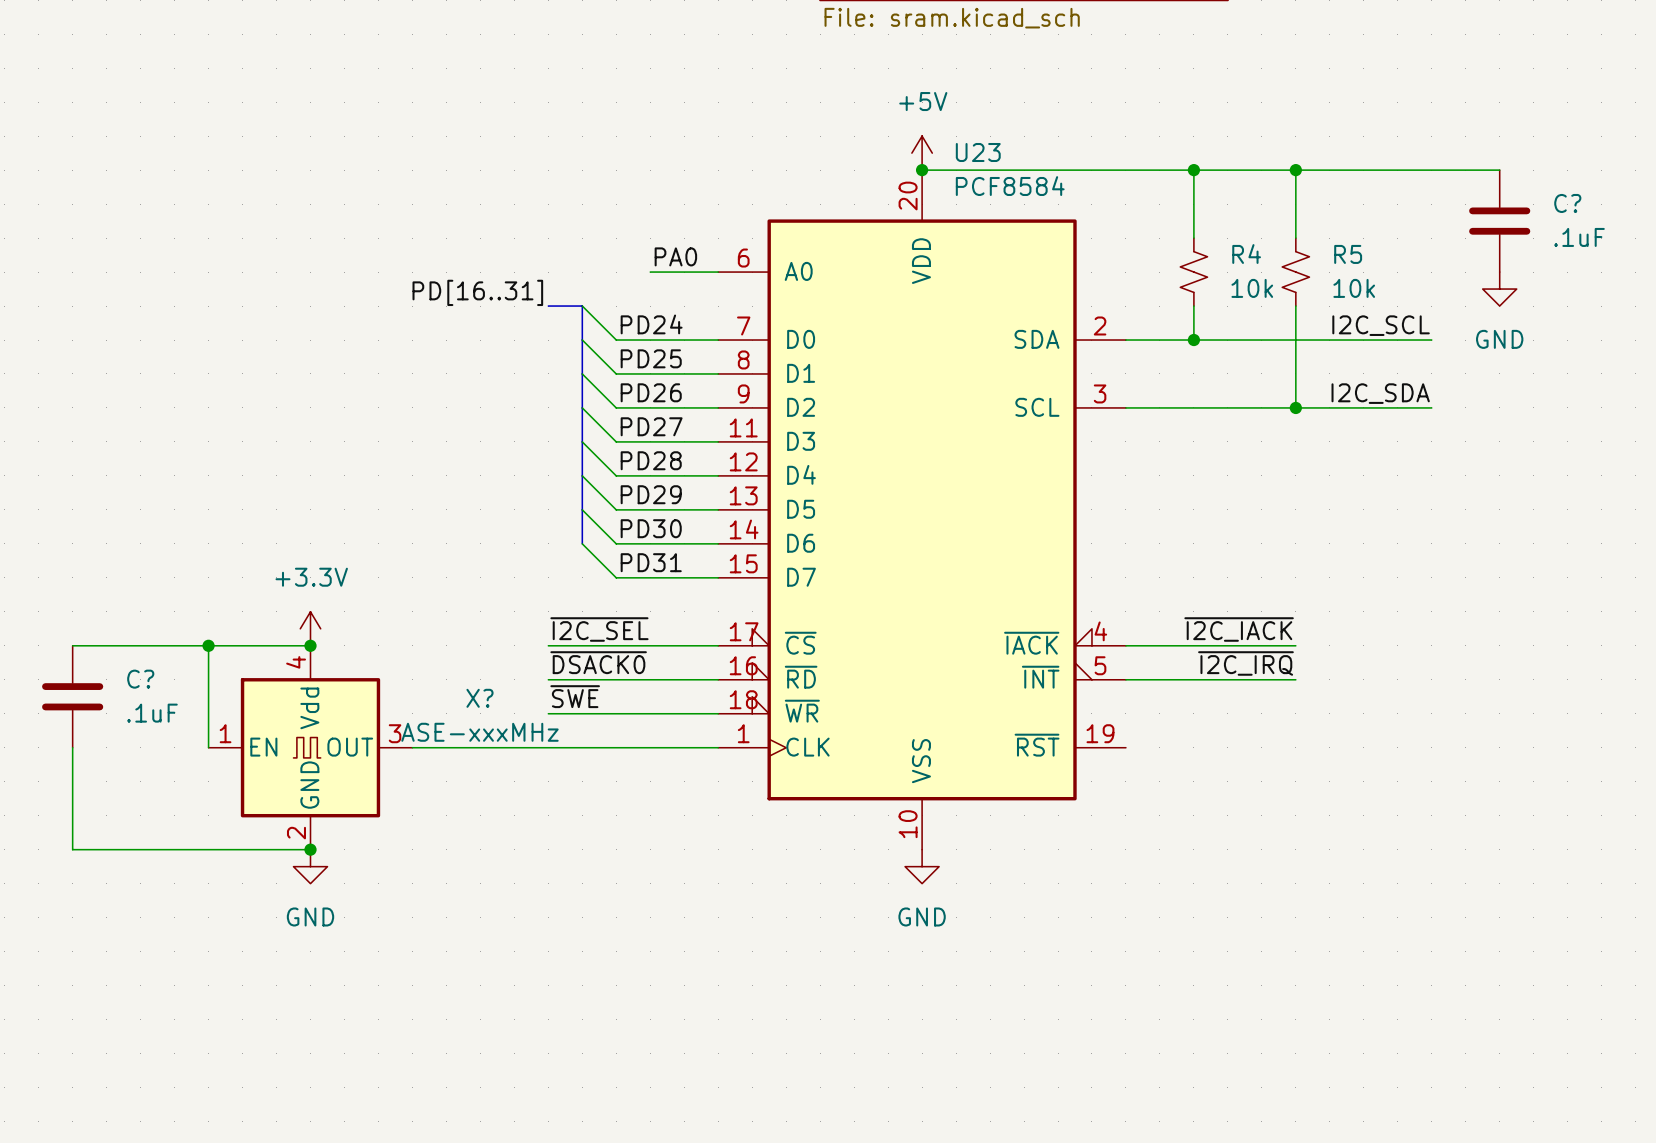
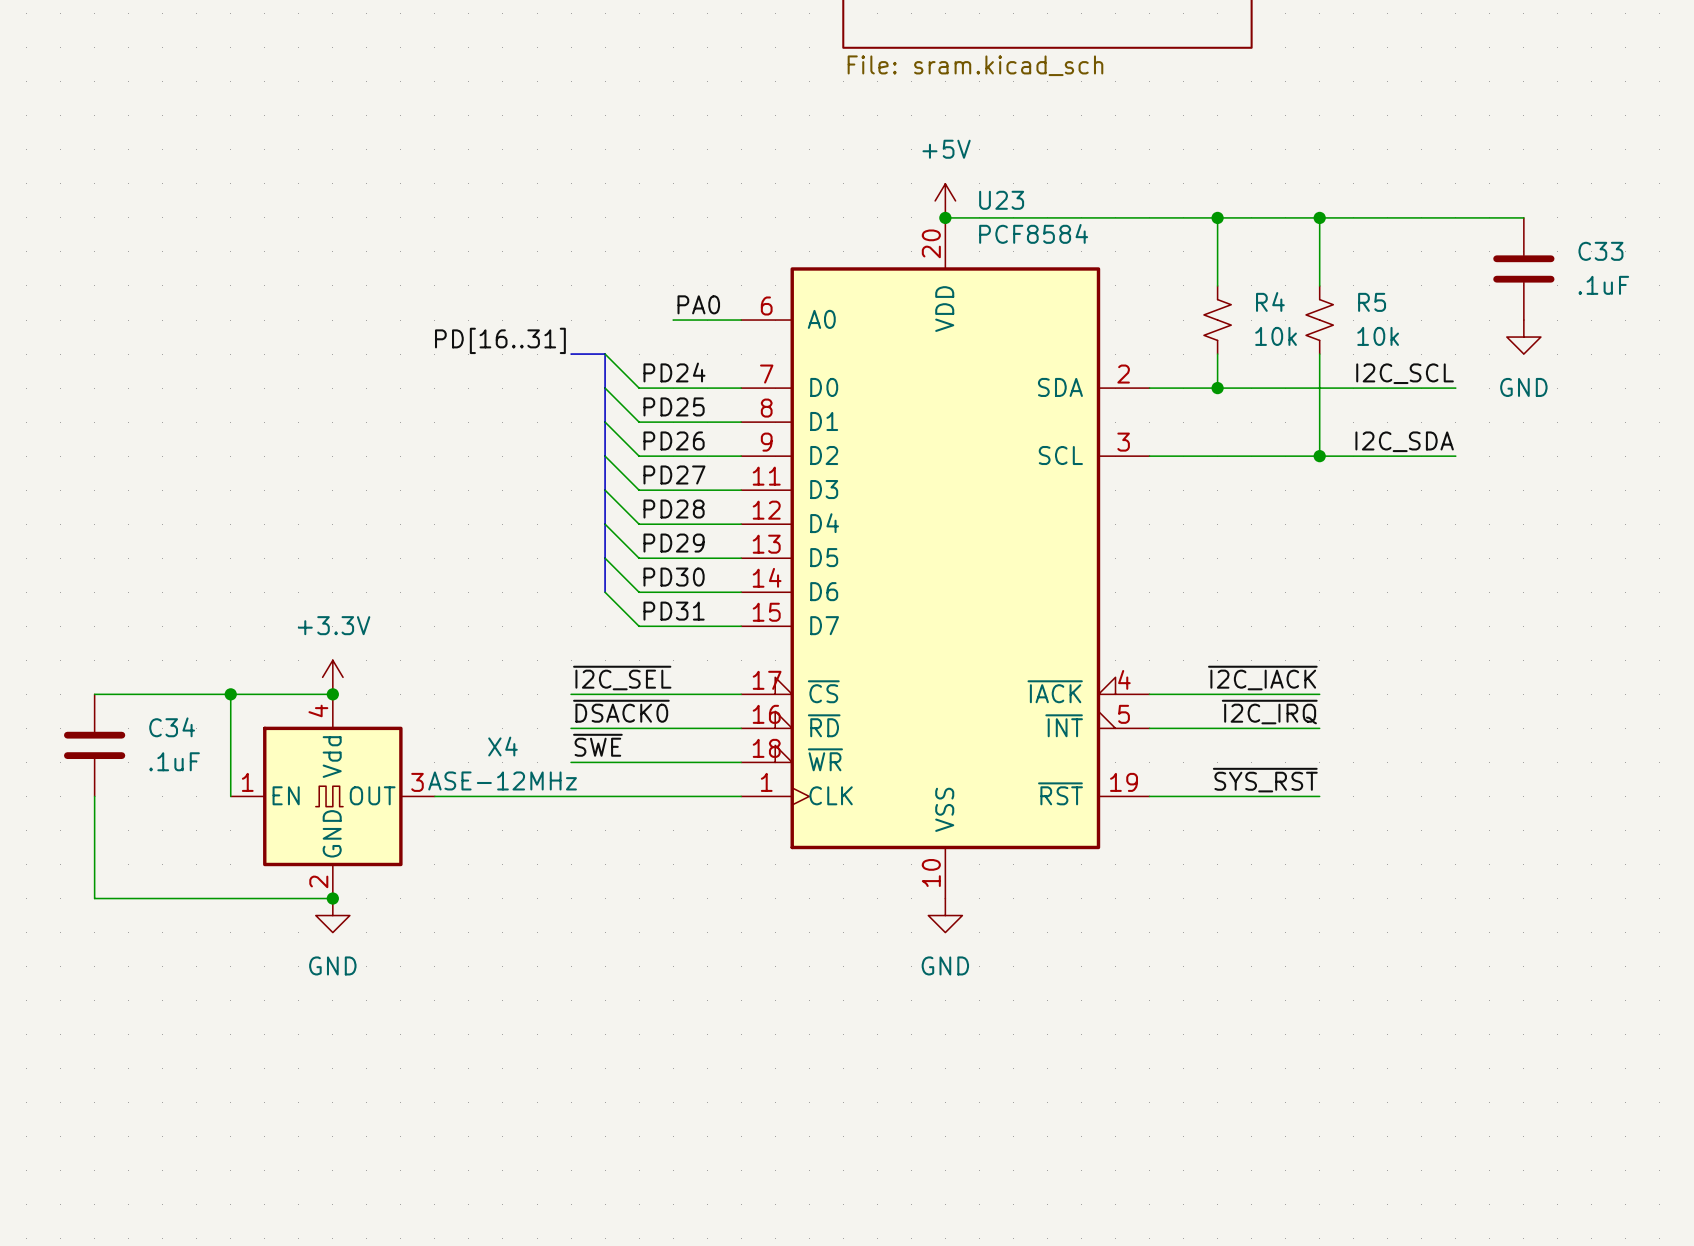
C? name: C? (1567, 203) -> C33 (1600, 251)
C? name: C? (140, 679) -> C34 (172, 727)
X? name: X? (479, 698) -> X4 (502, 746)
label: none -> ~{SYS_RST} (1265, 780)
X? value: ASE-xxxMHz (479, 732) -> ASE-12MHz (502, 780)
wire: none -> (1149, 796) (1319, 796)

